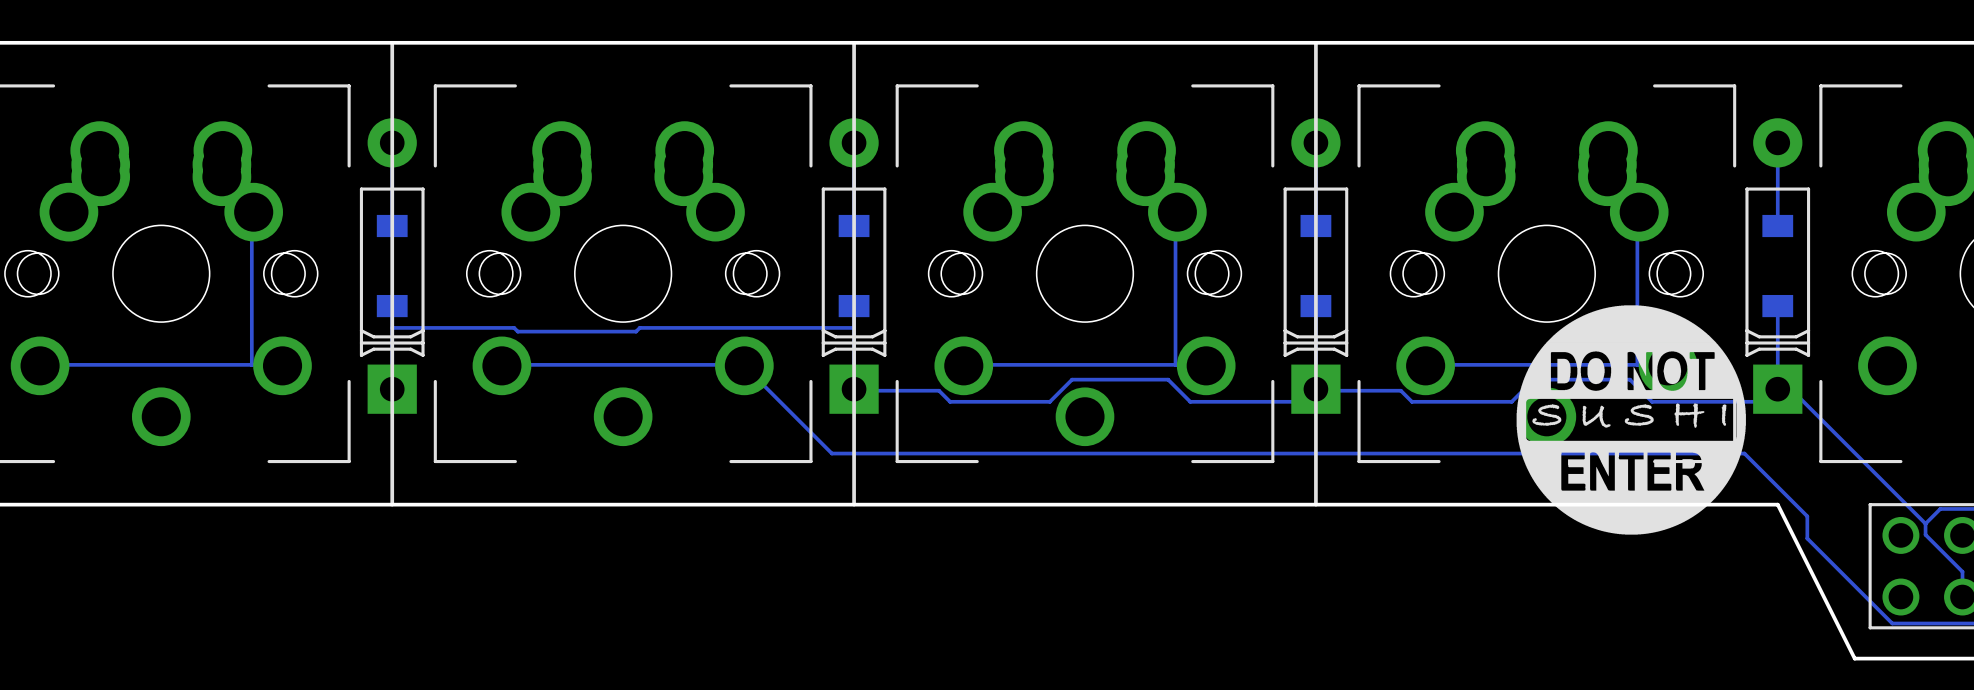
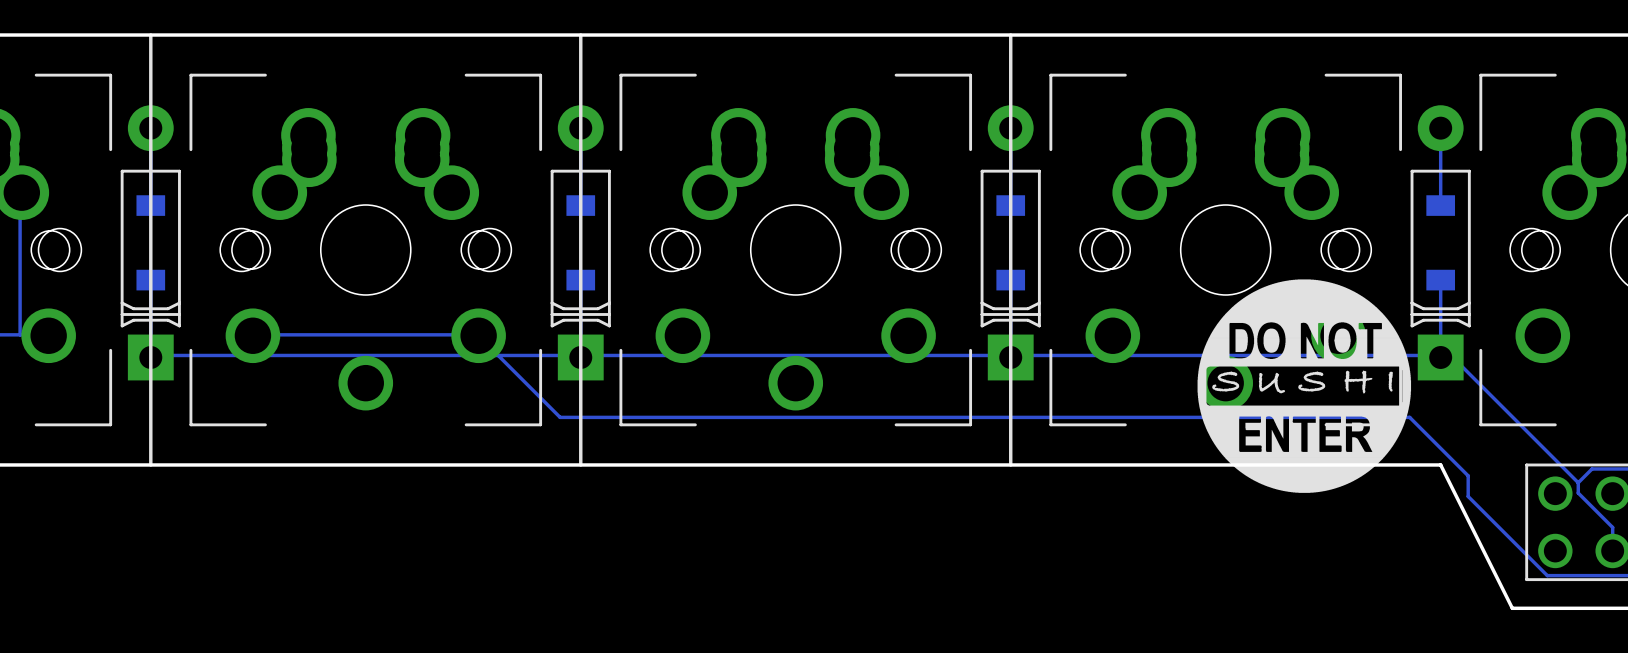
track: (1177, 212) (1175, 213) (1175, 364) -> none
track: (1639, 212) (1637, 213) (1637, 364) -> none
track: (854, 327) (639, 327) (636, 331) (517, 331) (514, 327) (392, 327) -> none
track: (1206, 365) (963, 365) -> none
track: (1668, 365) (1425, 365) -> none
track: none -> (1440, 355) (150, 355)
track: (854, 389) (854, 390) (939, 390) (950, 401) (1049, 401) (1072, 379) (1168, 379) (1190, 401) (1304, 401) (1315, 390) (1400, 390) (1411, 401) (1511, 401) (1533, 379) (1629, 379) (1652, 401) (1766, 401) (1777, 390) -> none

